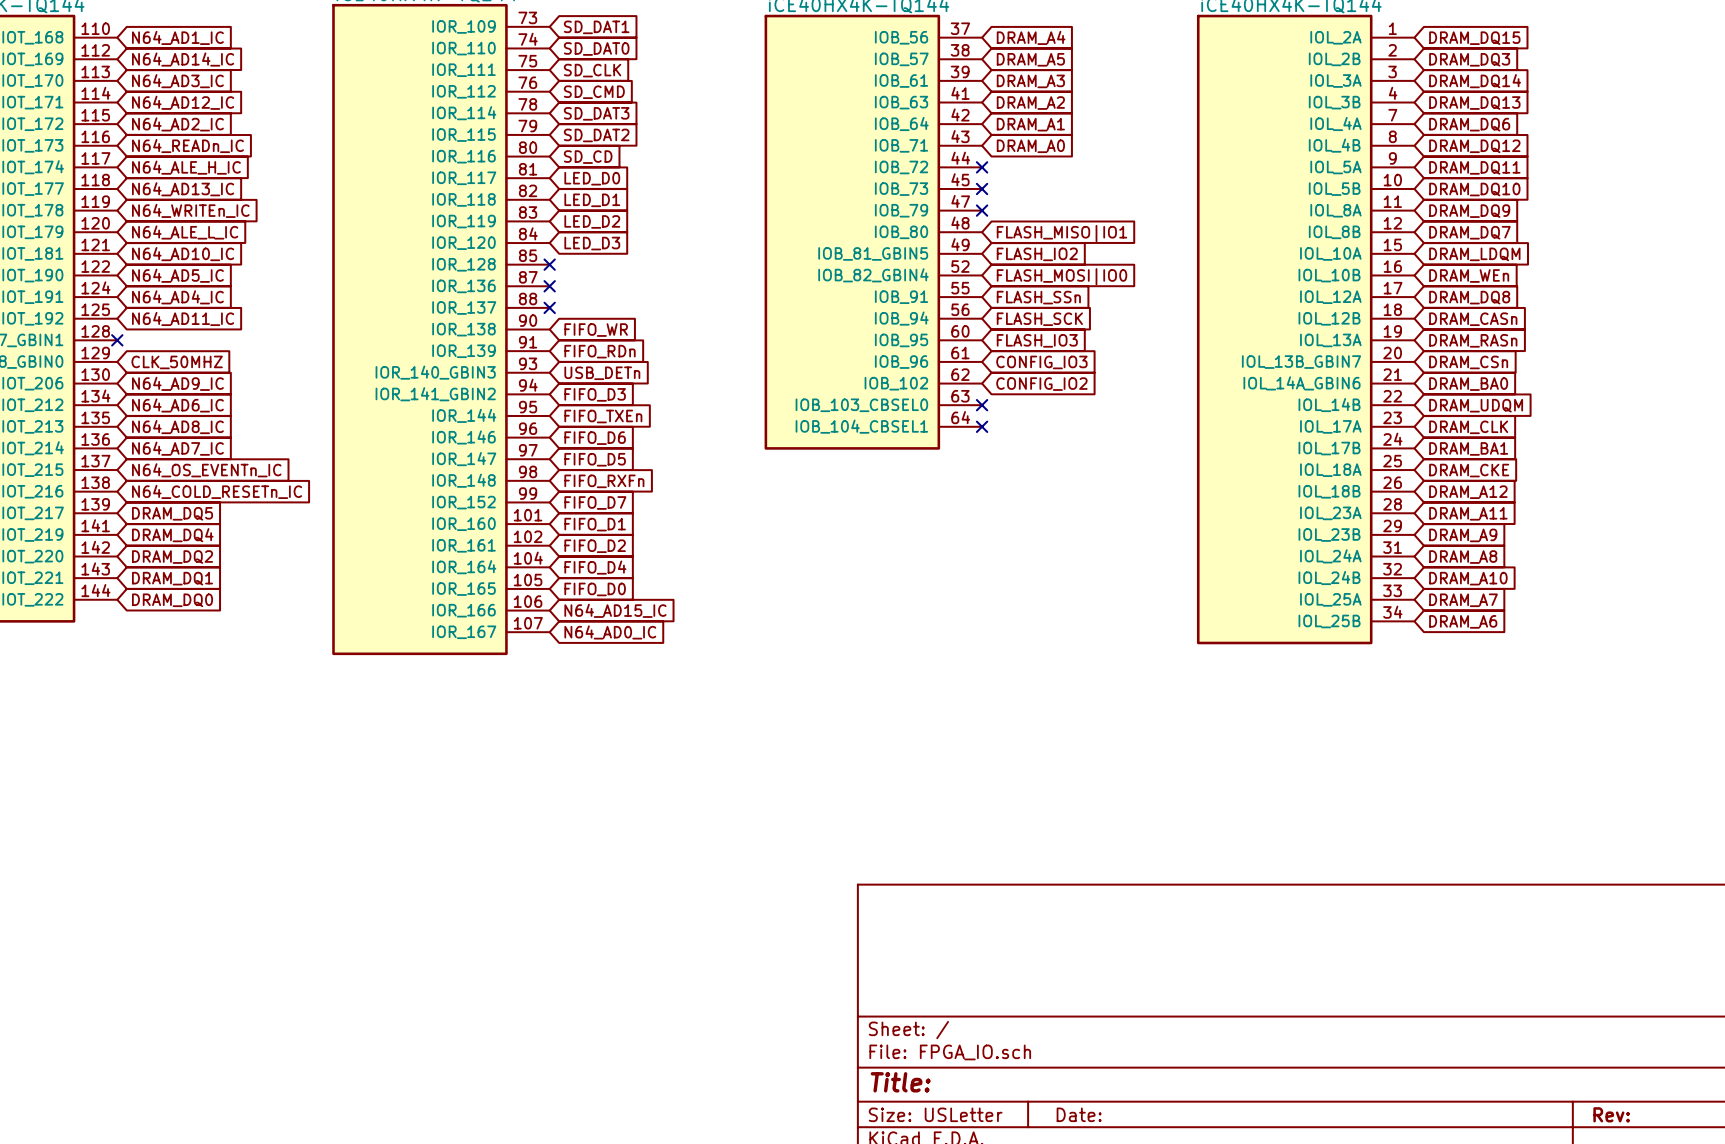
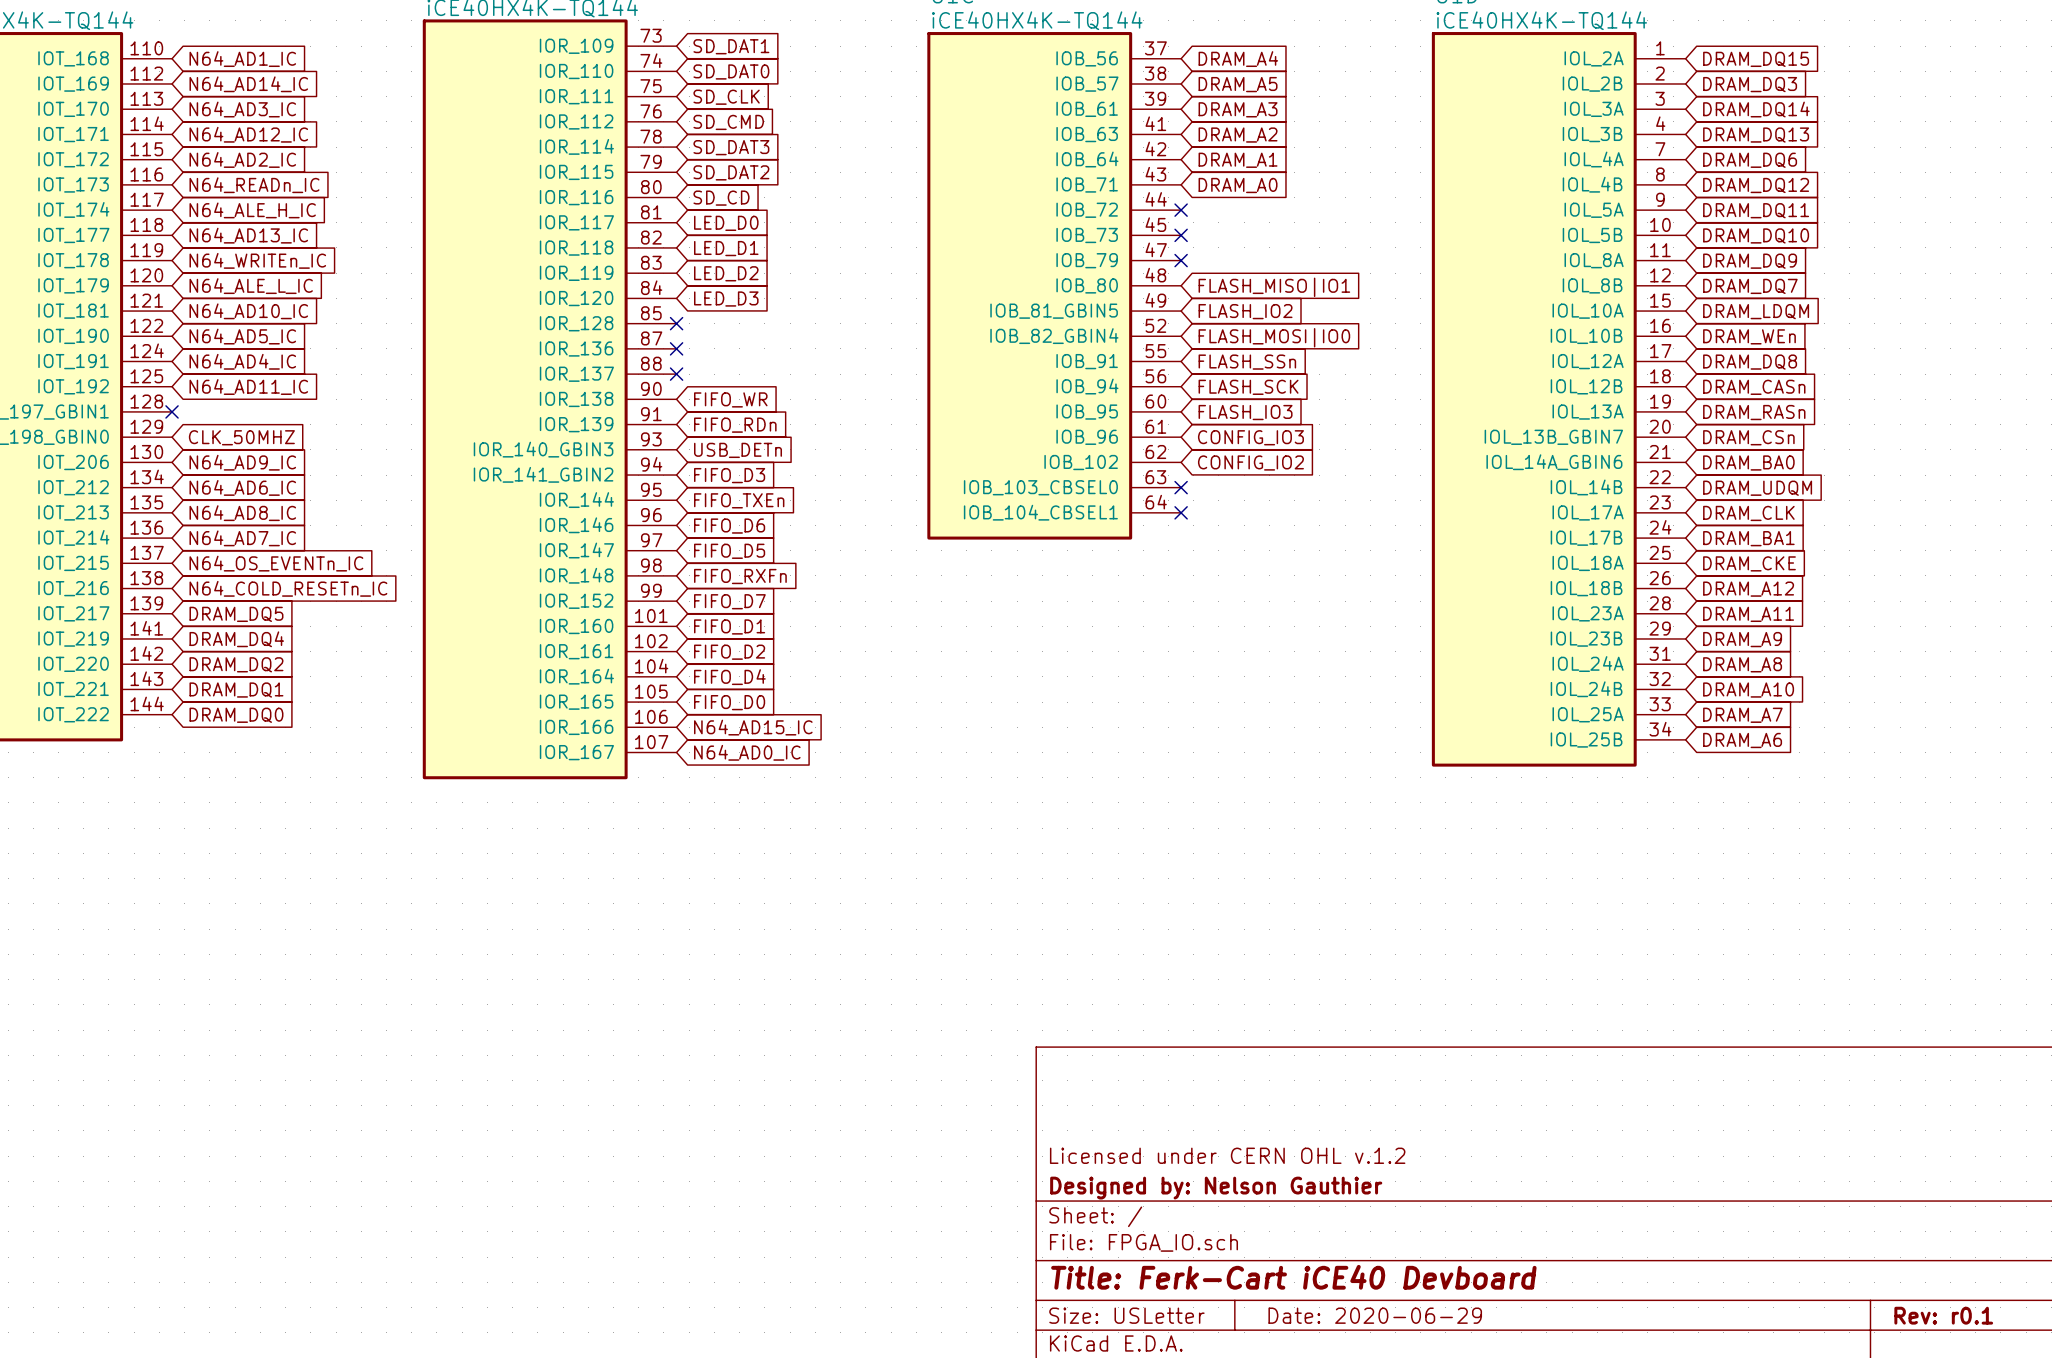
title block: none -> Licensed under CERN OHL v.1.2 (1227, 1155)
title block: none -> Designed by: Nelson Gauthier (1216, 1188)
title block: Title: (900, 1082) -> Title: Ferk-Cart iCE40 Devboard (1293, 1277)
title block: Date: (1079, 1114) -> Date: 2020-06-29 (1375, 1315)
title block: Rev: (1611, 1114) -> Rev: r0.1 (1943, 1315)

